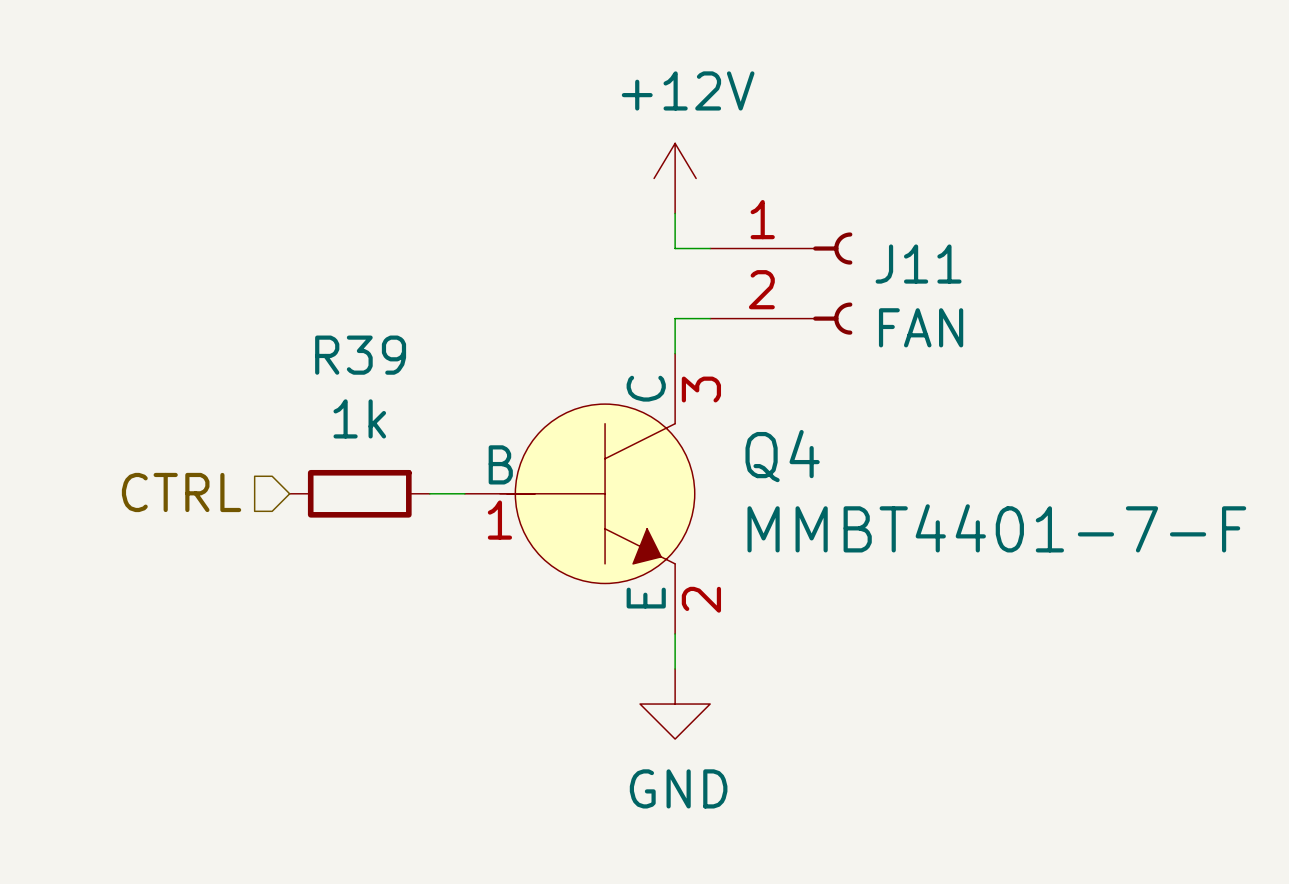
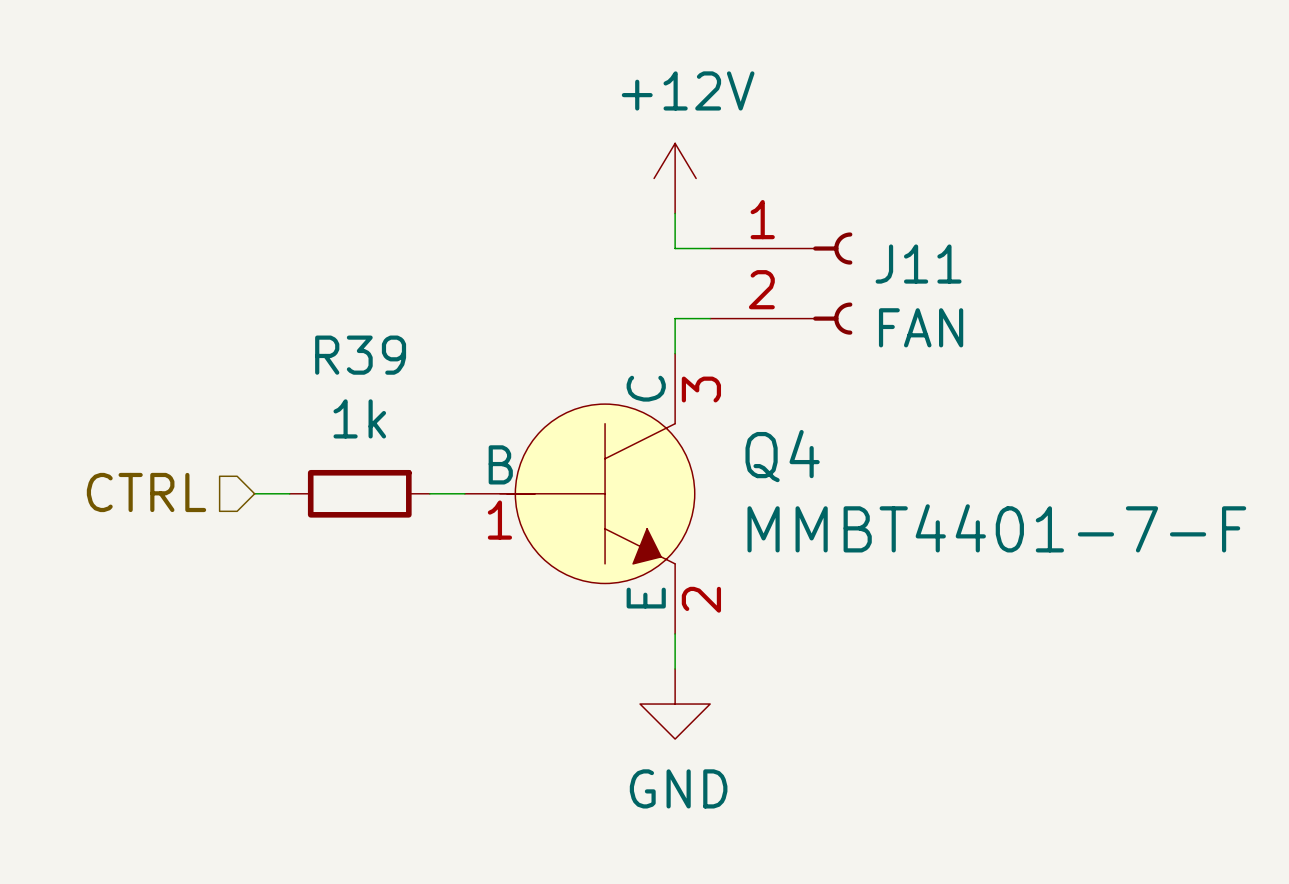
hierarchical label position: CTRL (181, 492) -> CTRL (146, 492)
wire: none -> (254, 493) (289, 493)

